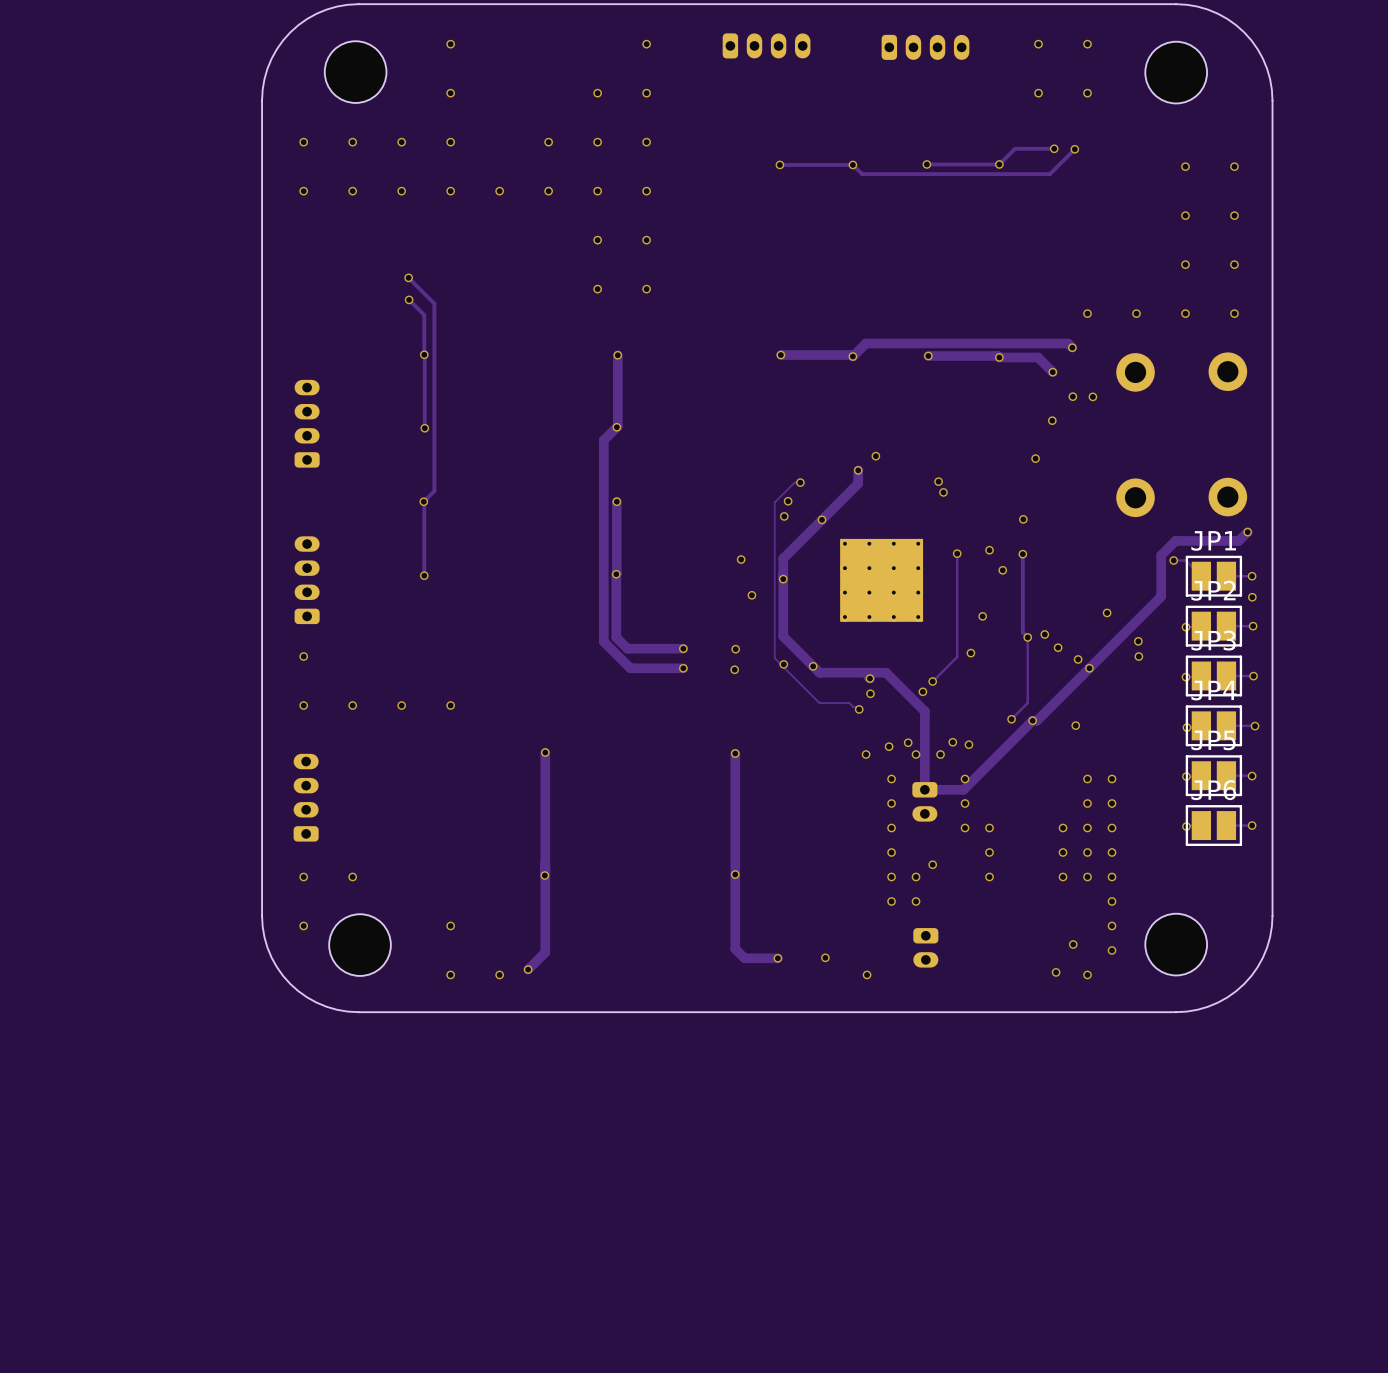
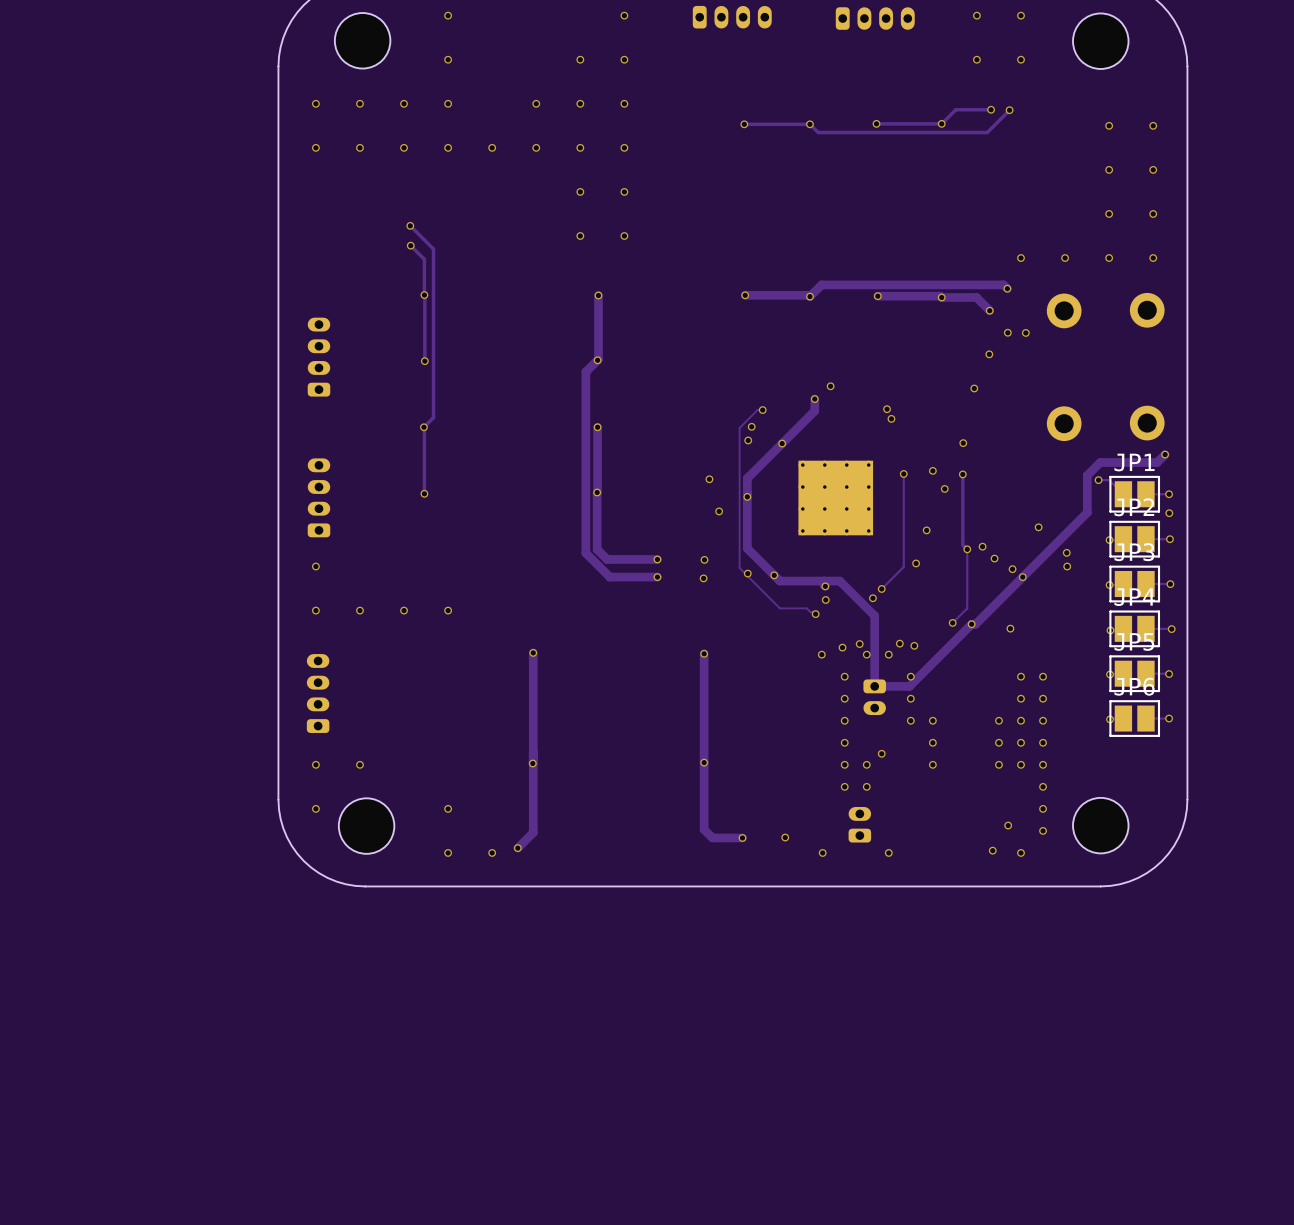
part rotation: 0° (925, 947) -> 180° (859, 824)
via: none -> (888, 852)

